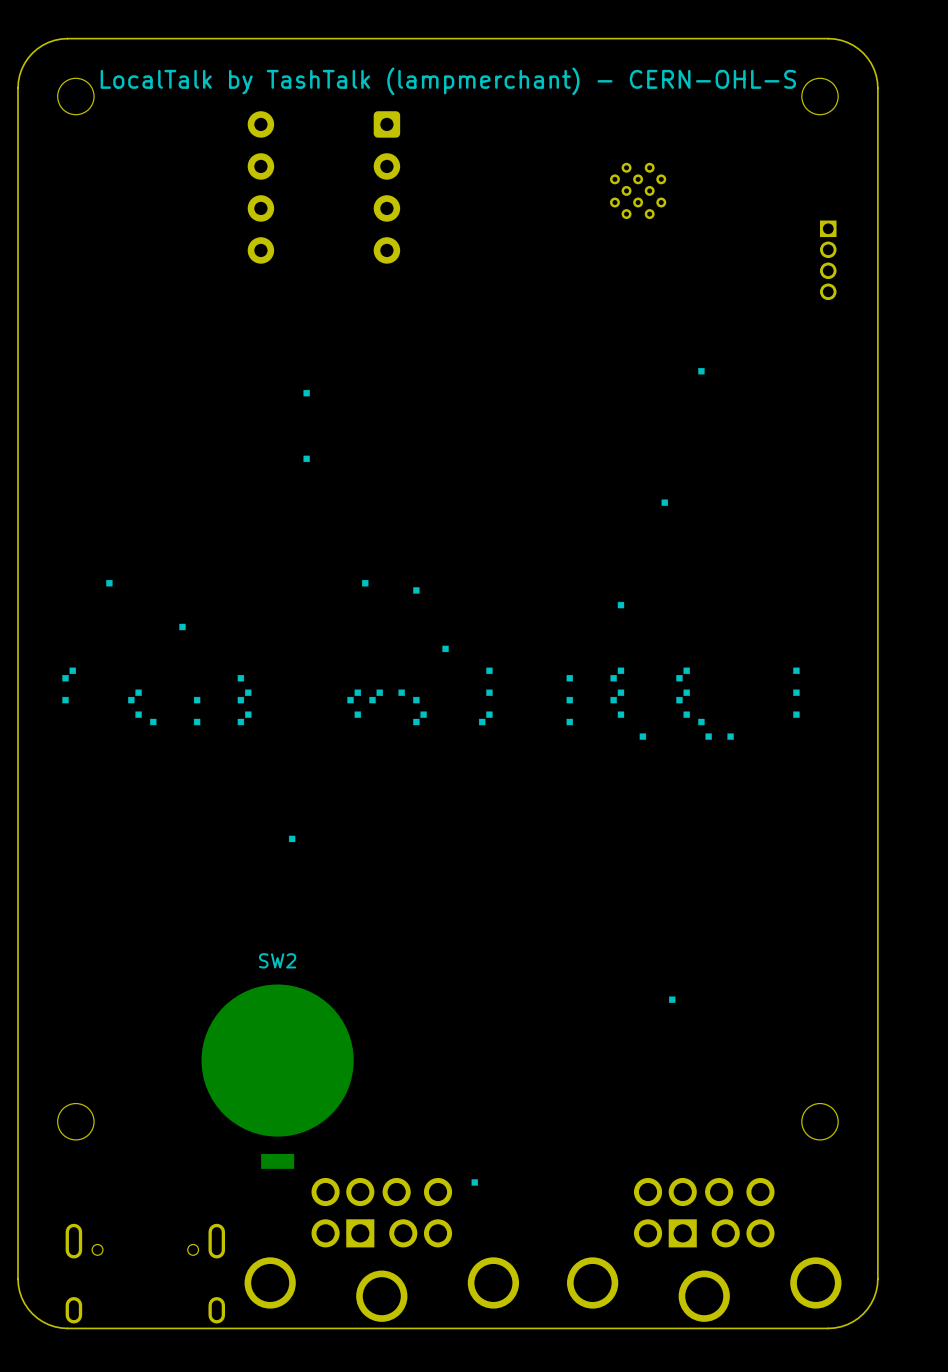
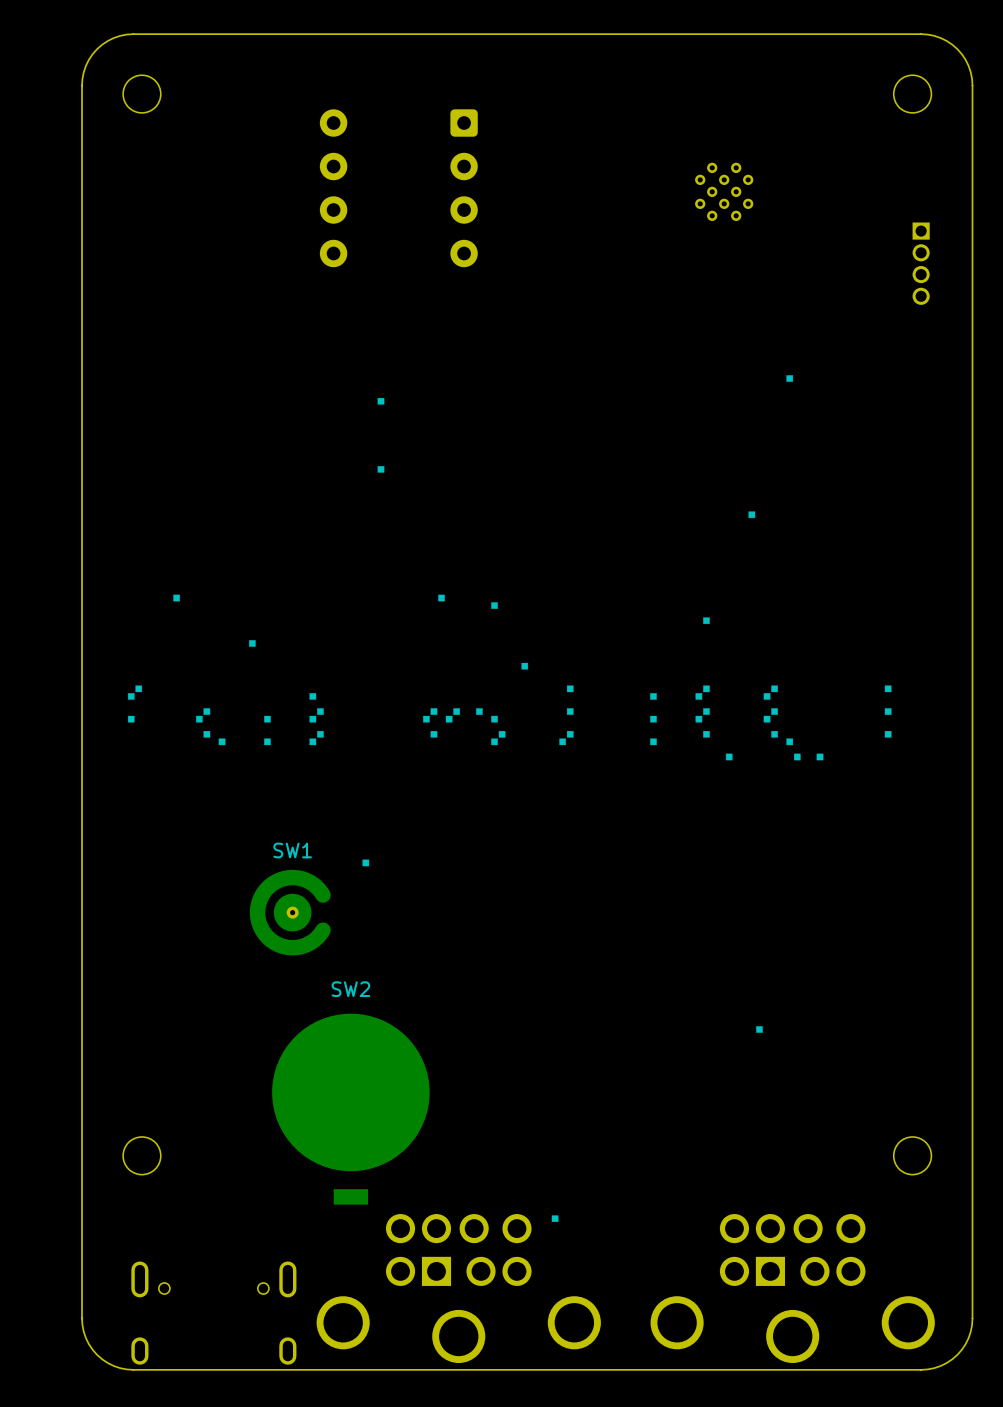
text: LocalTalk by TashTalk (lampmerchant) - CERN-OHL-S (448, 81) -> none
SW1: none -> (290, 912)

